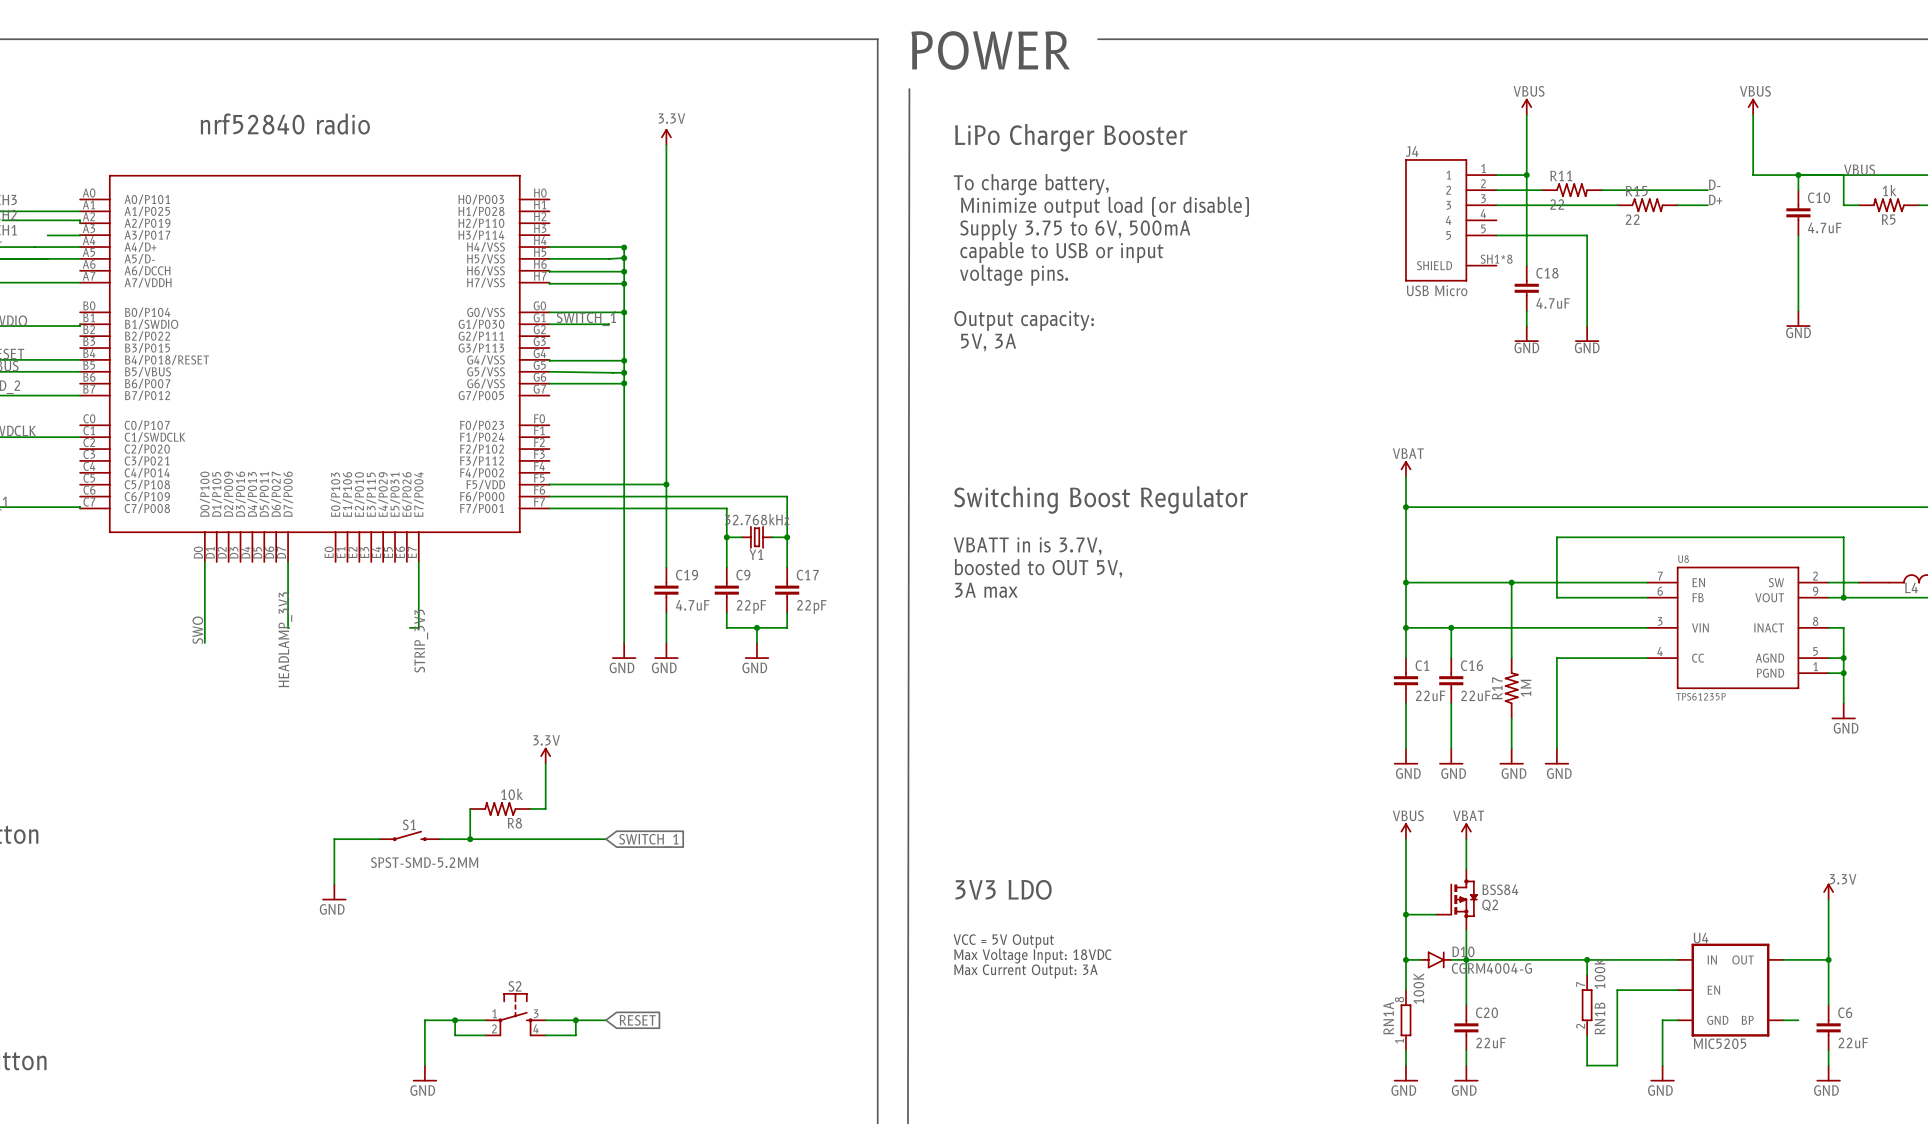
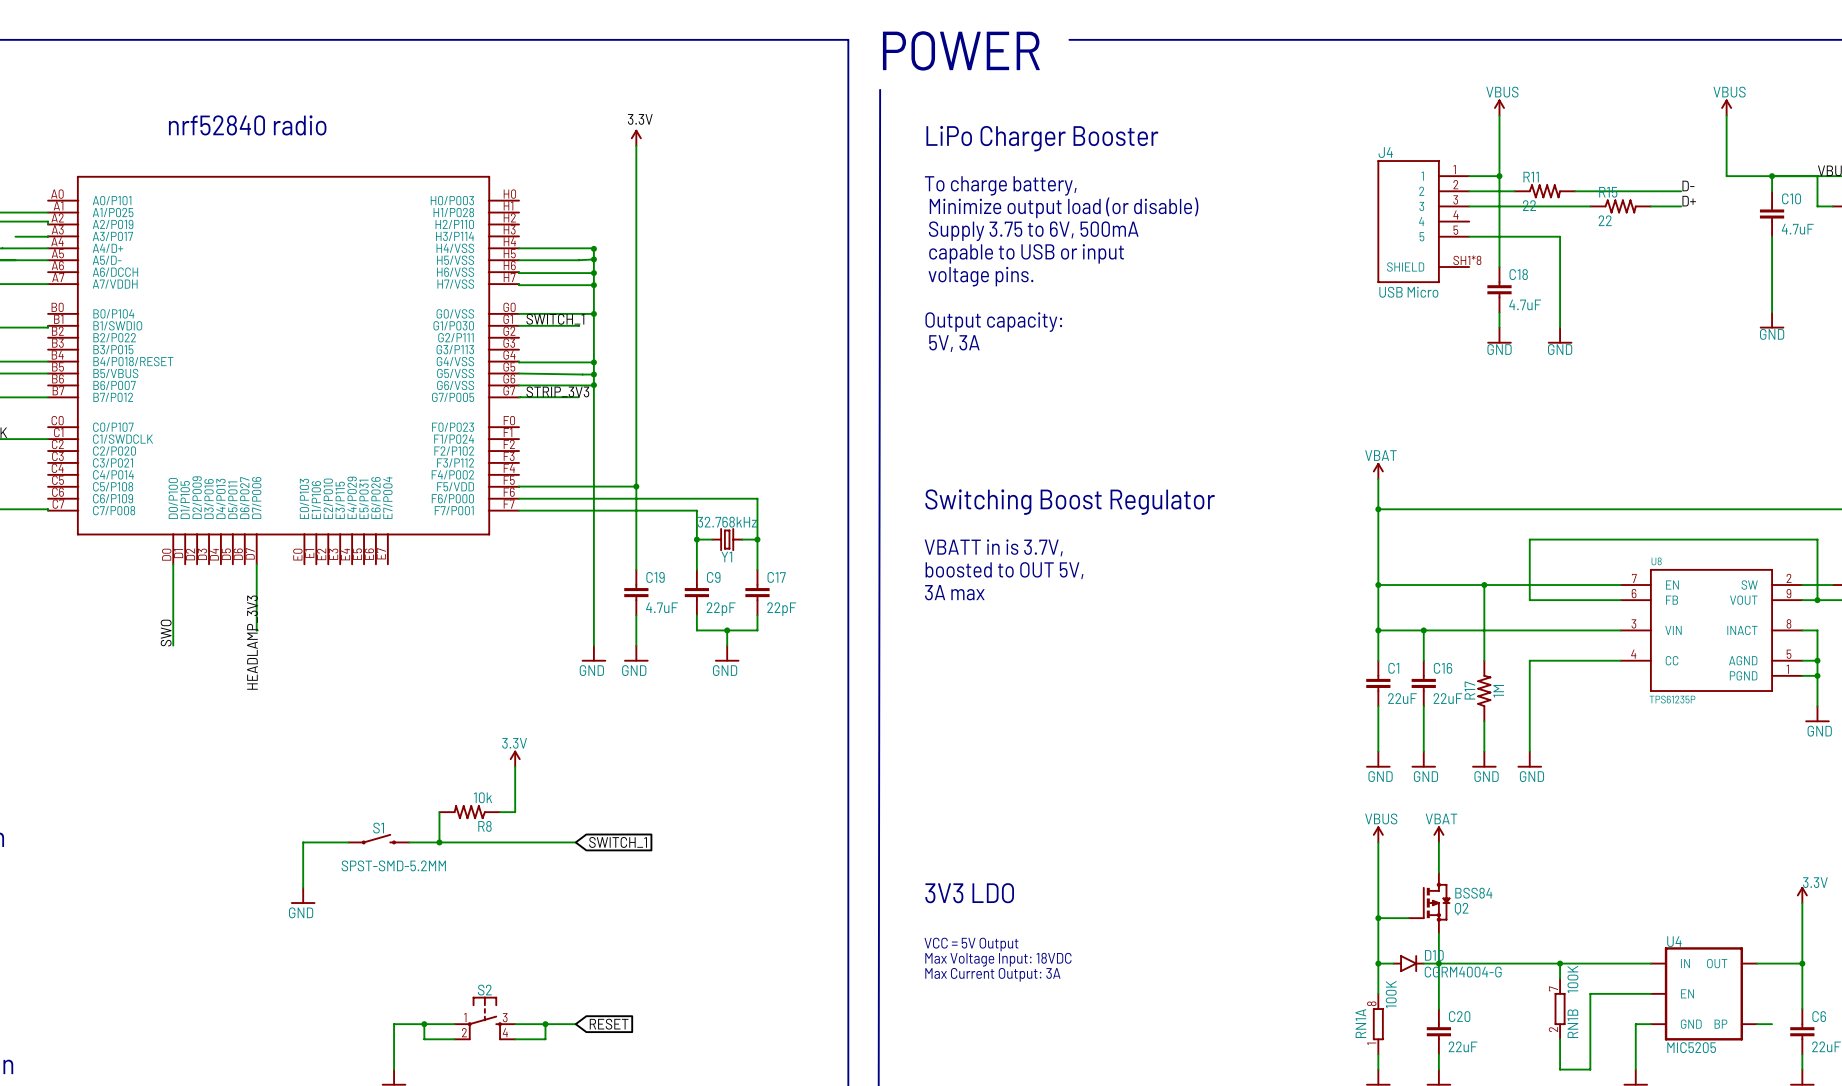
label: none -> STRIP_3V3 (557, 391)
wire: none -> (578, 397) (519, 397)
wire: (418, 561) (418, 627) (409, 627) -> none
label: STRIP_3V3 (421, 641) -> none

